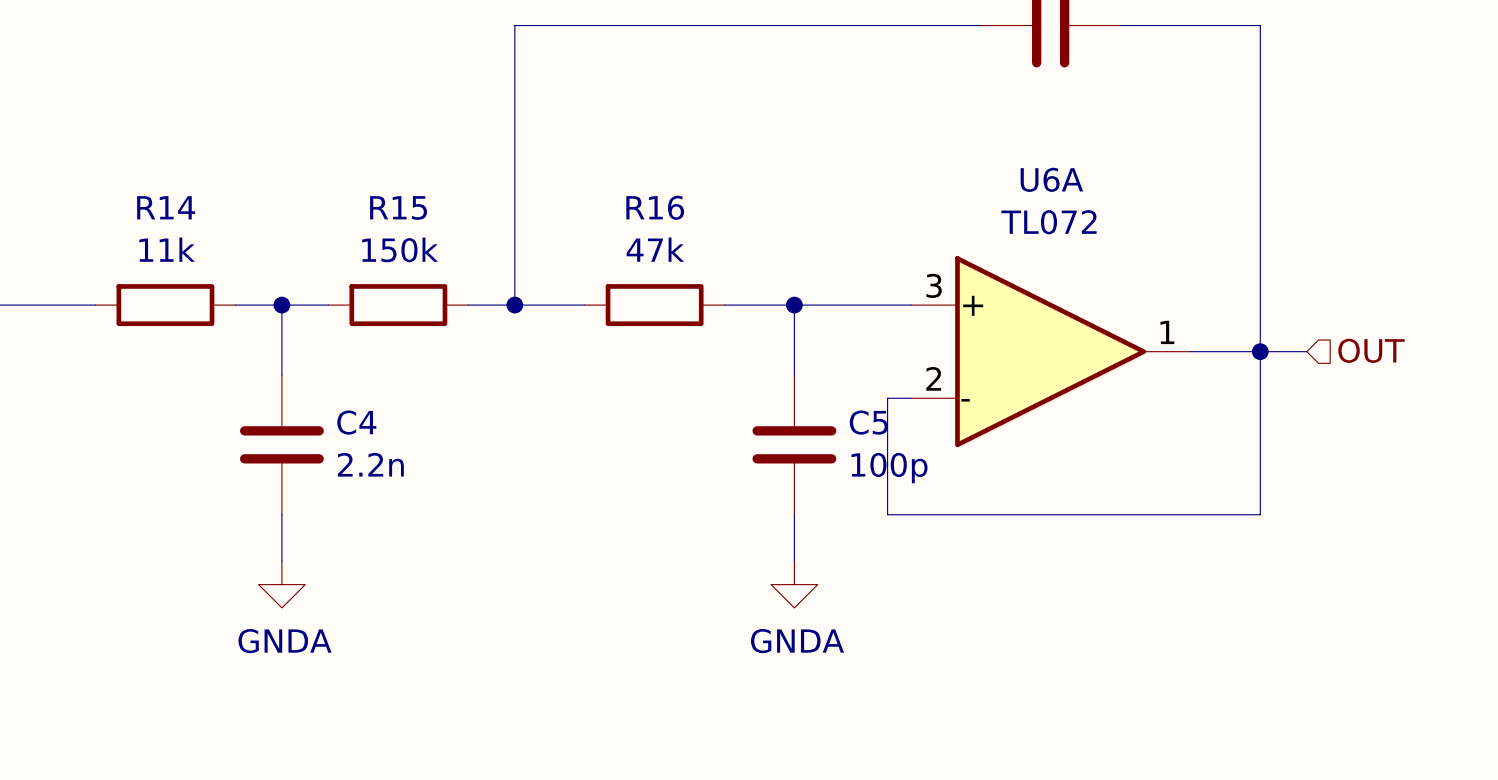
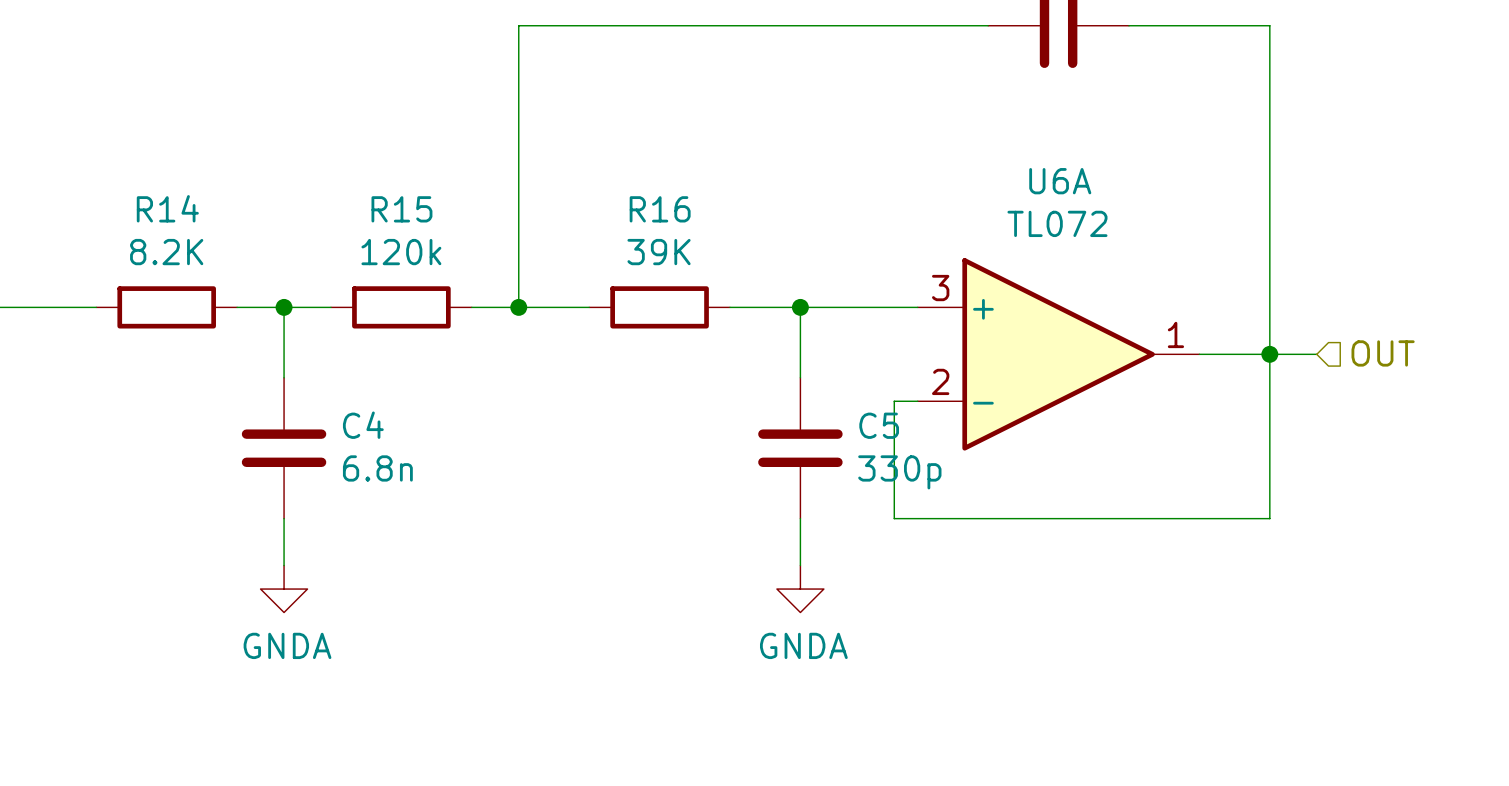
R14 value: 11k (167, 249) -> 8.2K (166, 252)
R15 value: 150k (400, 249) -> 120k (401, 252)
R16 value: 47k (655, 249) -> 39K (659, 252)
C4 value: 2.2n (370, 464) -> 6.8n (377, 468)
C5 value: 100p (889, 468) -> 330p (899, 472)

